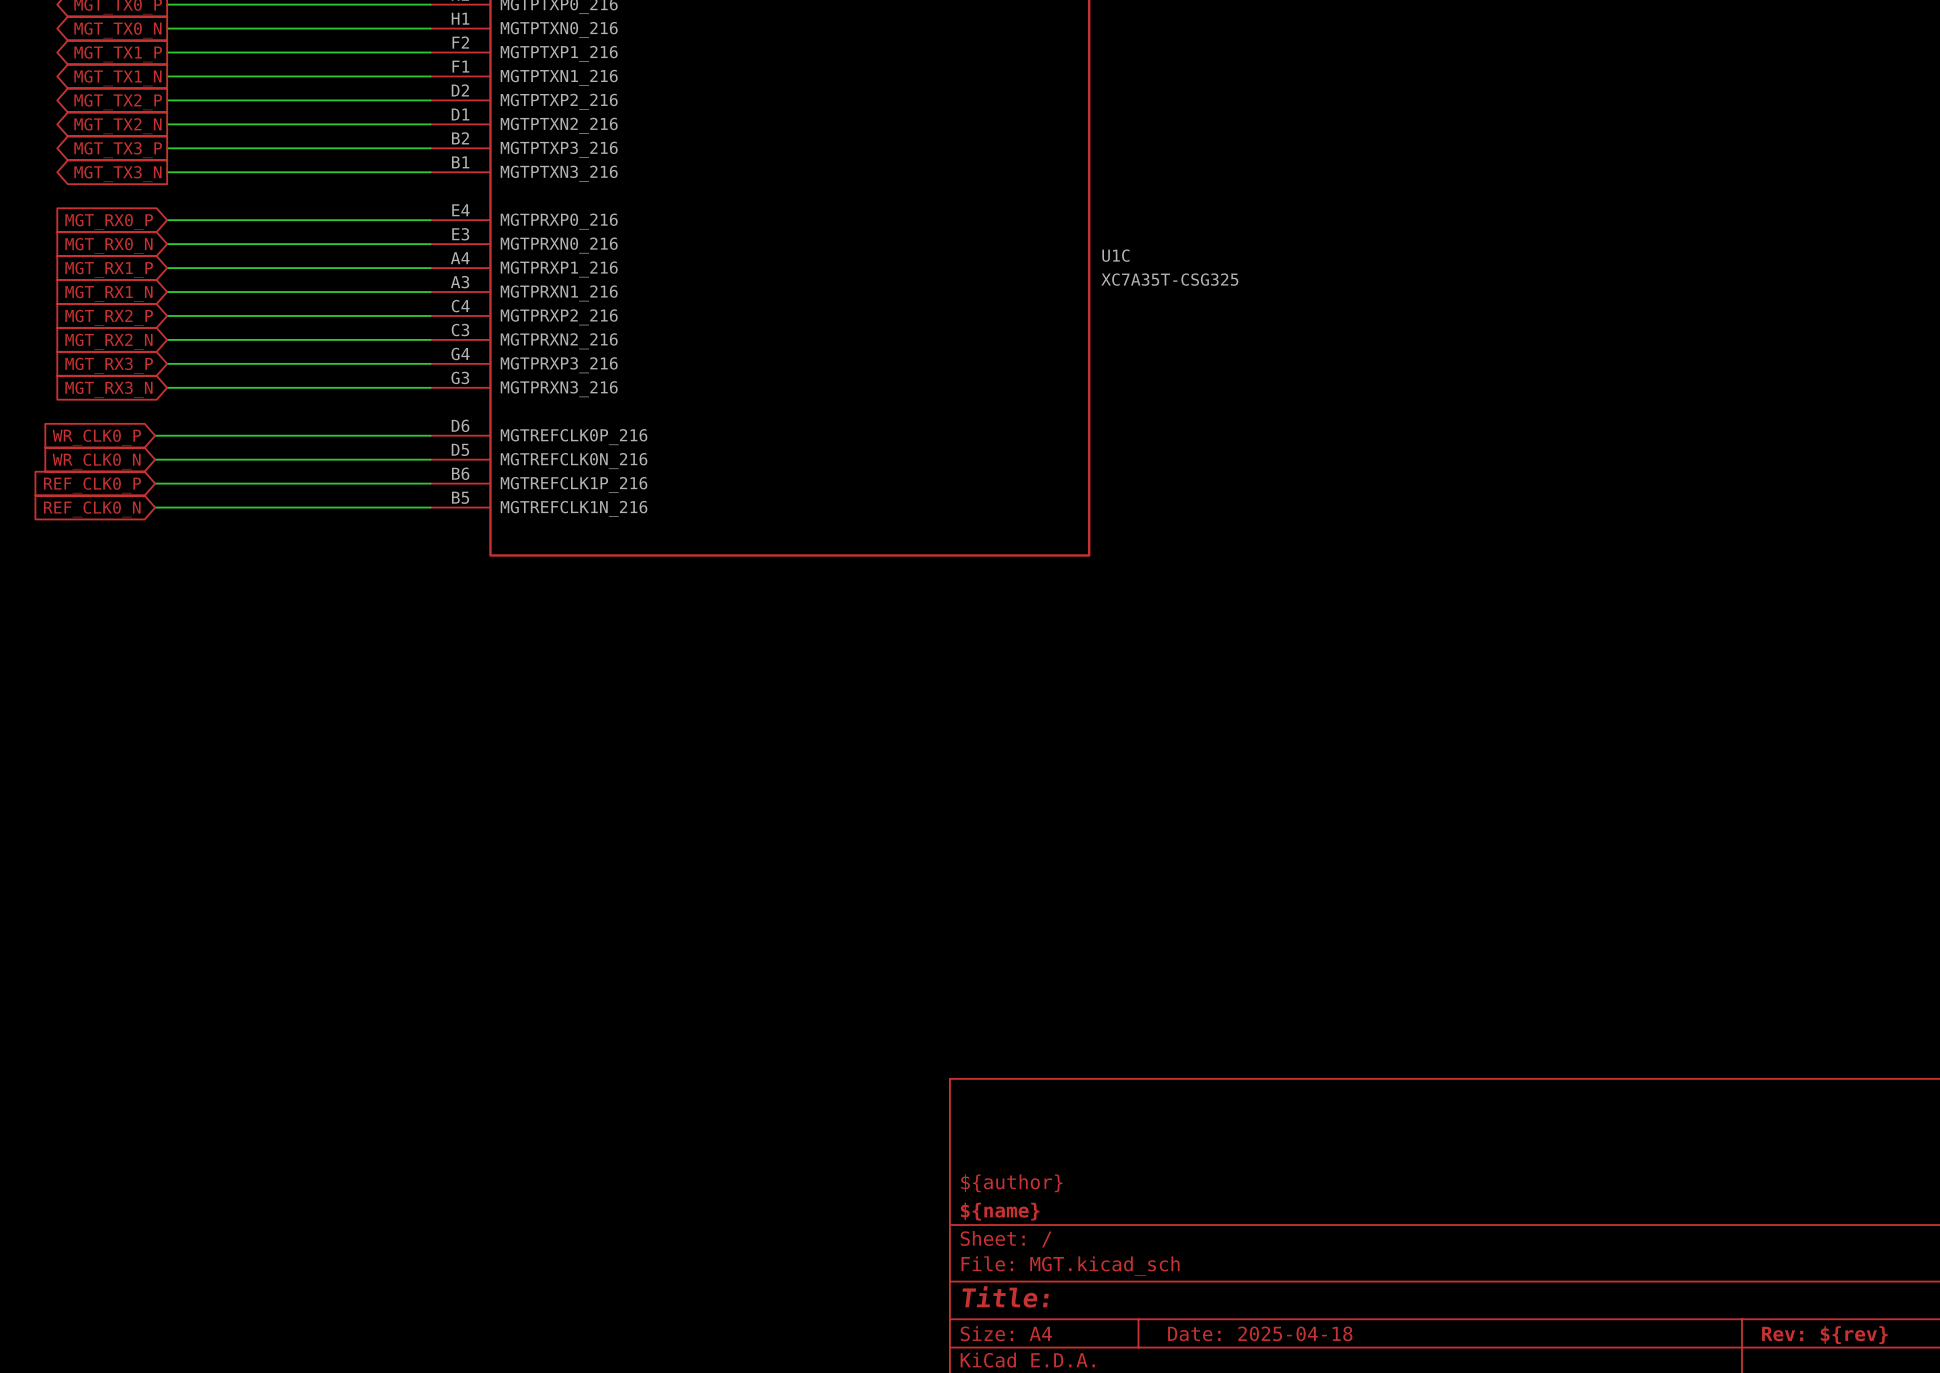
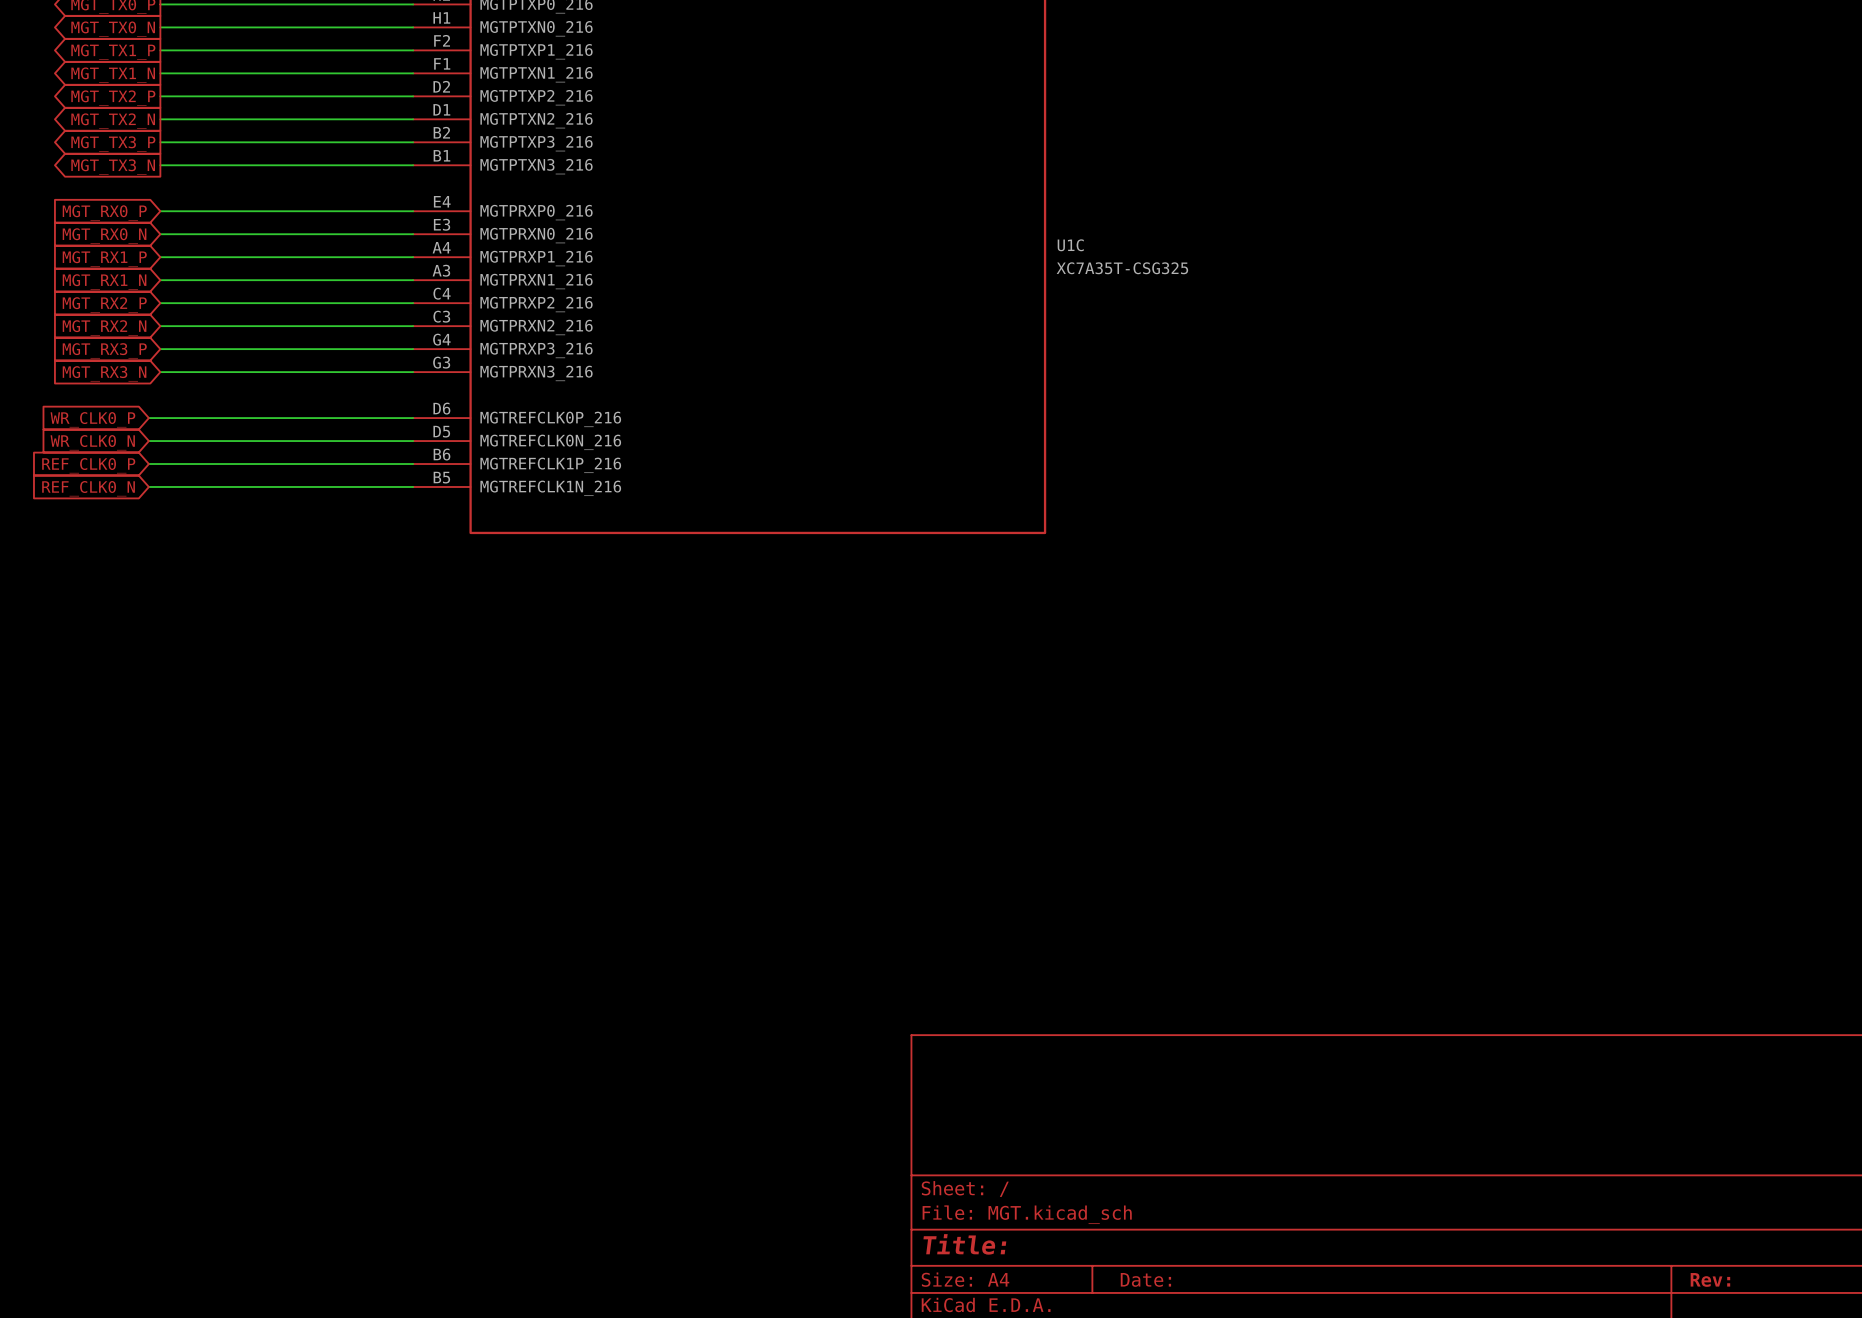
title block: ${author} (1011, 1183) -> none
title block: ${name} (1000, 1211) -> none
title block: Date: 2025-04-18 (1260, 1333) -> Date: (1145, 1279)
title block: Rev: ${rev} (1824, 1335) -> Rev: (1710, 1279)

